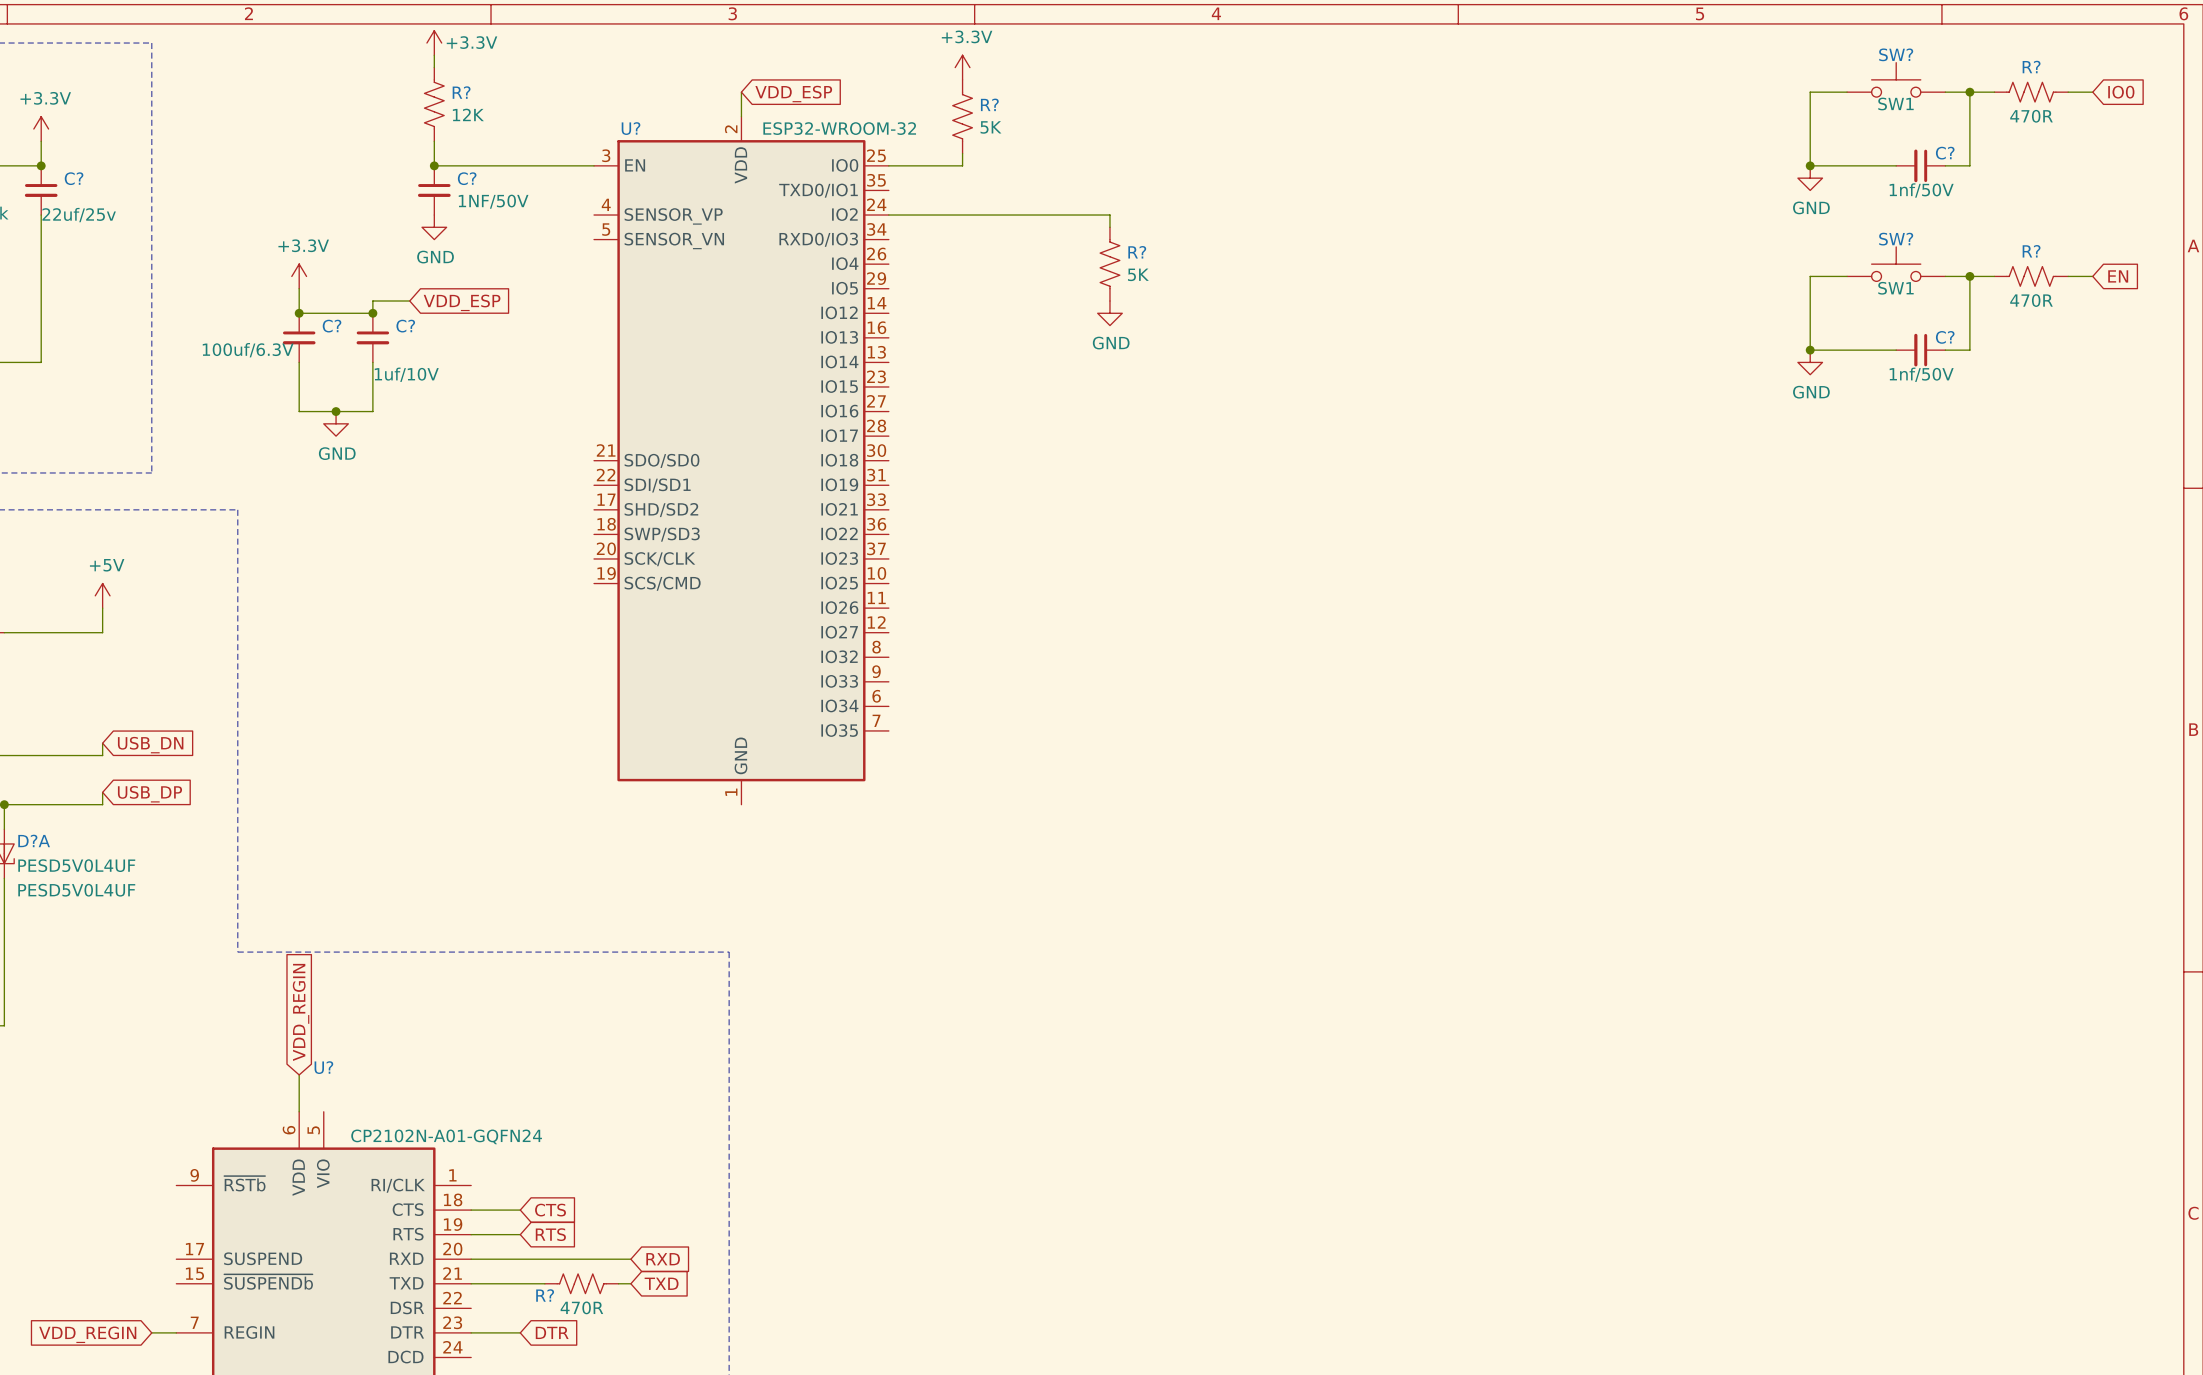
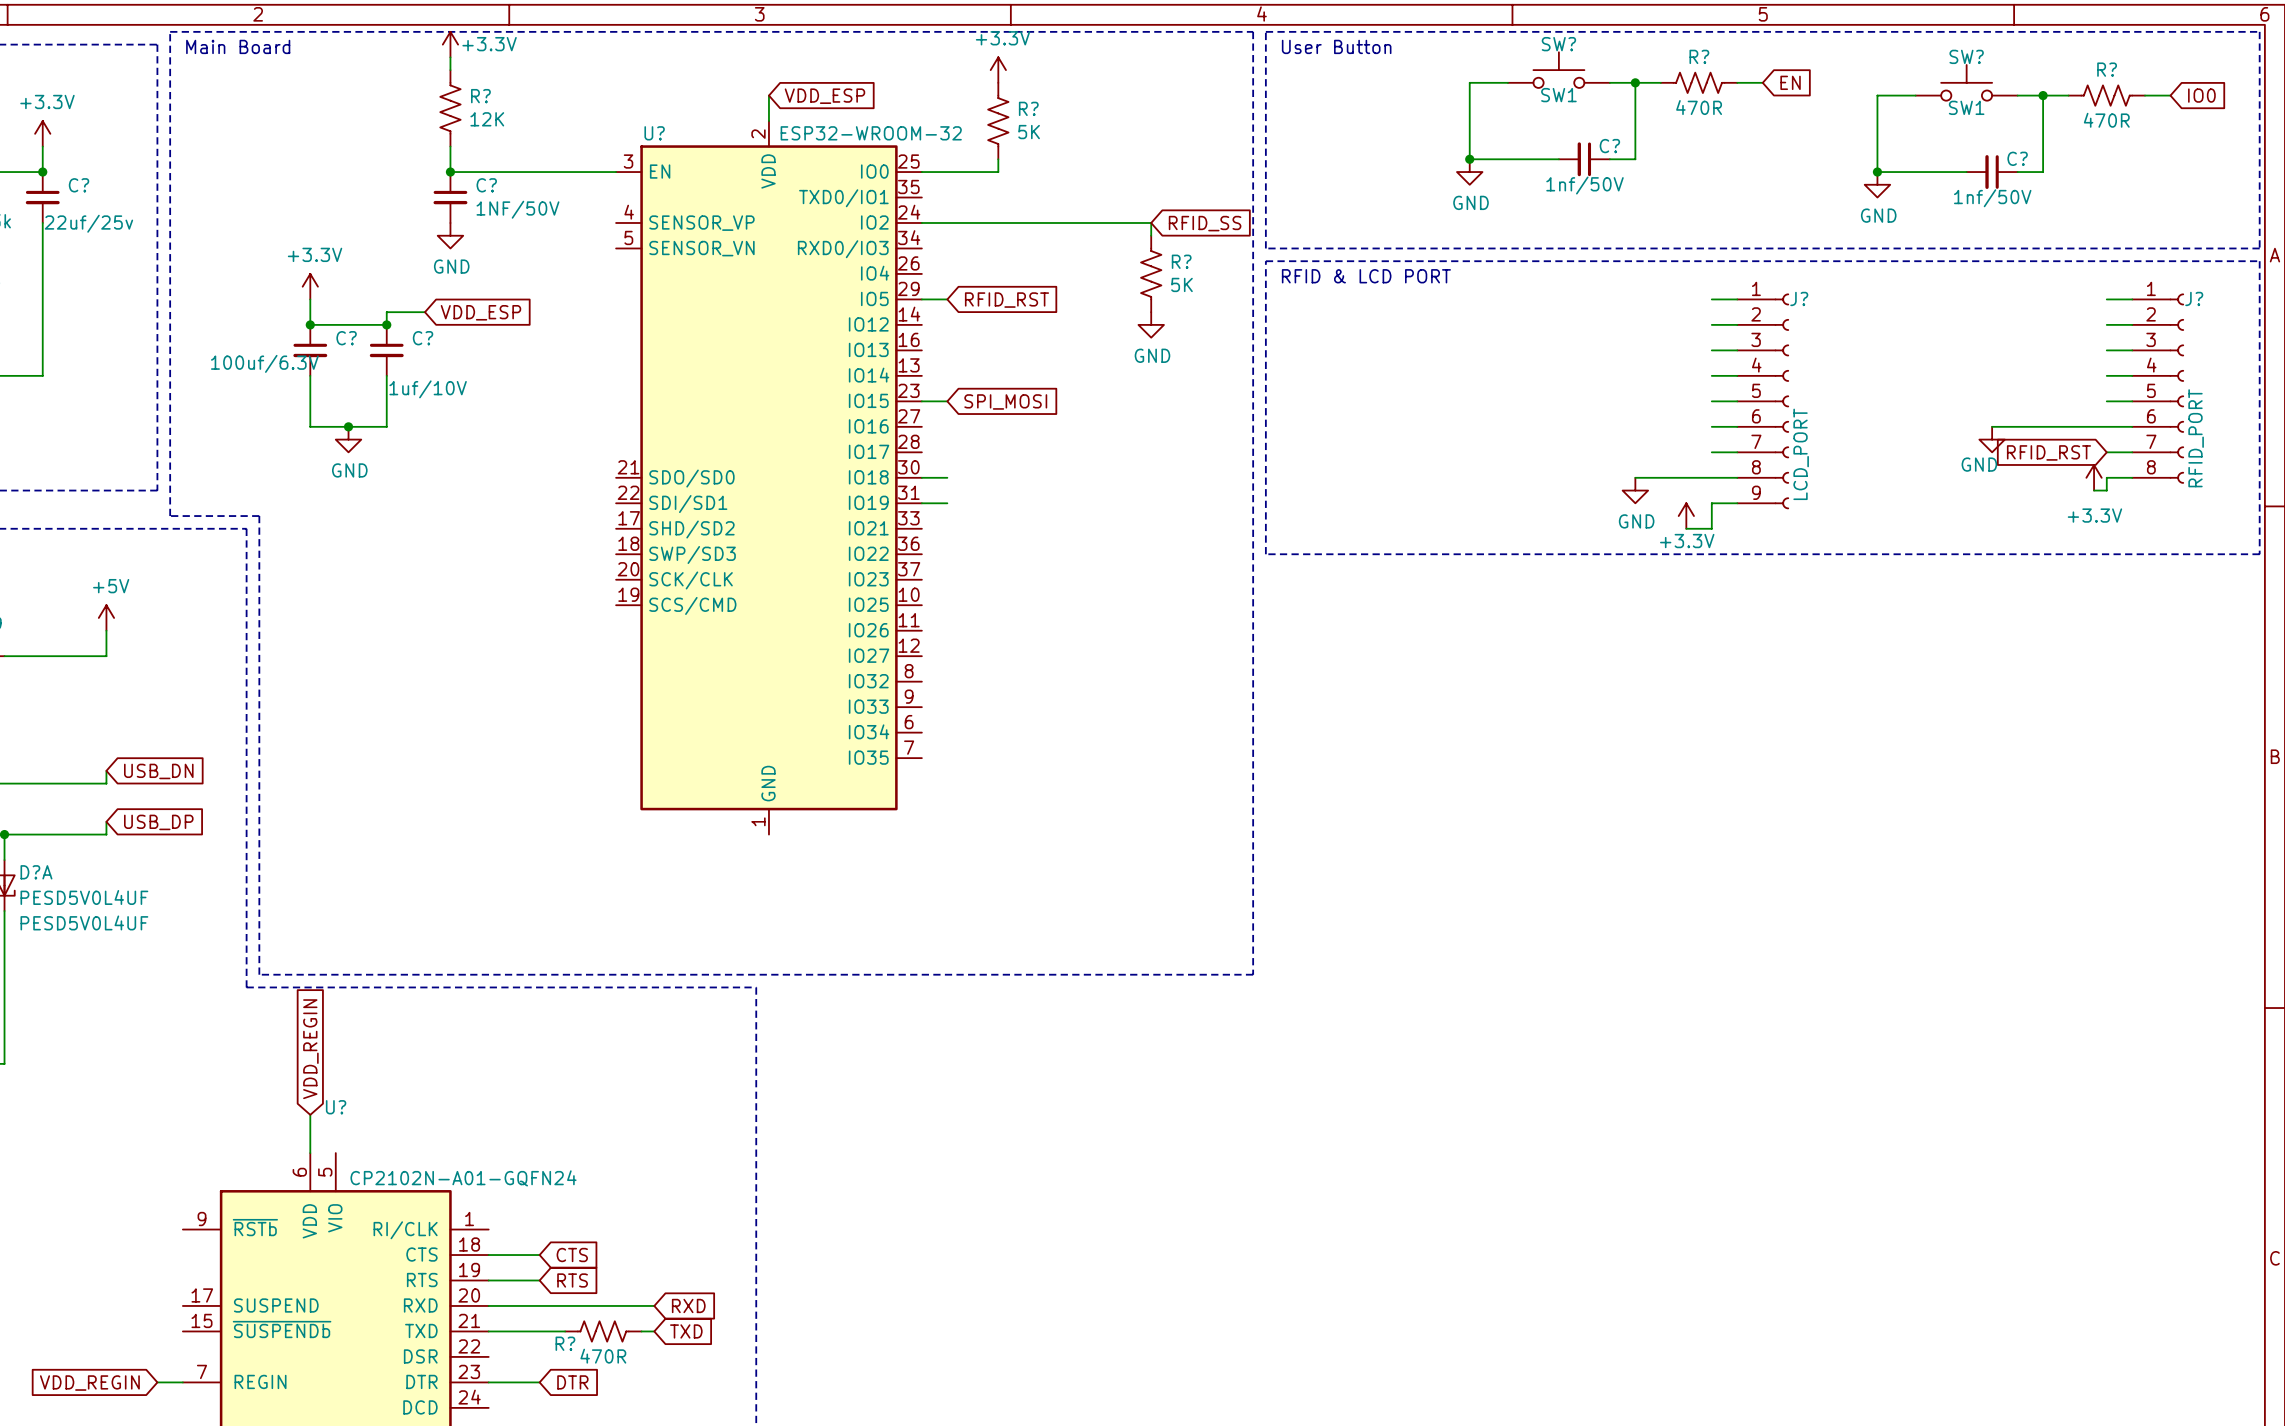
line: none -> (170, 31) (170, 516) (259, 516) (259, 974) (1253, 974) (1253, 31) (170, 31)
line: none -> (1265, 31) (2259, 31) (2259, 248) (1265, 248) (1265, 31)
text: none -> Main Board (238, 46)
text: none -> User Button (1336, 46)
SW?: none -> SW1 (1558, 70)
wire: none -> (1507, 82) (1469, 82) (1469, 159) (1558, 159)
wire: none -> (1609, 82) (1660, 82)
wire: none -> (1635, 82) (1635, 159) (1609, 159)
junction: none -> (1635, 82)
R?: none -> 470R (1699, 82)
wire: none -> (1737, 82) (1762, 82)
global label: none -> EN (1790, 82)
junction: none -> (1469, 159)
C?: none -> 1nf/50V (1584, 159)
power symbol: none -> GND (1469, 172)
global label: none -> RFID_SS (1205, 223)
line: none -> (1265, 261) (1265, 554) (2259, 554) (2259, 261) (1265, 261)
SW?: SW1 (1896, 264) -> none
text: none -> RFID & LCD PORT (1366, 276)
wire: (1847, 276) (1810, 276) (1810, 350) (1896, 350) -> none
wire: (1945, 276) (1994, 276) -> none
wire: (1969, 276) (1969, 350) (1945, 350) -> none
junction: (1969, 276) -> none
R?: 470R (2031, 276) -> none
wire: (2068, 276) (2092, 276) -> (2106, 299) (2132, 299)
global label: EN (2118, 276) -> none
wire: none -> (921, 299) (947, 299)
wire: none -> (1711, 299) (1737, 299)
global label: none -> RFID_RST (1006, 300)
wire: none -> (1711, 324) (1737, 324)
wire: none -> (2106, 324) (2132, 324)
wire: none -> (1711, 350) (1737, 350)
wire: none -> (2106, 350) (2132, 350)
junction: (1810, 350) -> none
C?: 1nf/50V (1920, 350) -> none
wire: none -> (1711, 375) (1737, 375)
power symbol position: GND (1810, 362) -> GND (1992, 439)
wire: none -> (2106, 375) (2132, 375)
J?: none -> RFID_PORT (2158, 388)
wire: none -> (921, 401) (947, 401)
wire: none -> (1711, 401) (1737, 401)
J?: none -> LCD_PORT (1763, 401)
wire: none -> (2106, 401) (2132, 401)
global label: none -> SPI_MOSI (1005, 401)
power symbol text position: GND (1811, 392) -> GND (1979, 464)
wire: none -> (1711, 426) (1737, 426)
wire: none -> (1992, 426) (2132, 426)
wire: none -> (1711, 452) (1737, 452)
wire: none -> (2106, 452) (2132, 452)
global label: none -> RFID_RST (2048, 452)
wire: none -> (921, 477) (947, 477)
wire: none -> (1635, 477) (1737, 477)
power symbol: none -> +3.3V (2094, 477)
wire: none -> (2132, 477) (2106, 477) (2106, 490) (2094, 490)
power symbol: none -> GND (1635, 490)
wire: none -> (921, 503) (947, 503)
wire: none -> (1737, 503) (1711, 503) (1711, 528) (1686, 528)
power symbol: none -> +3.3V (1686, 516)

